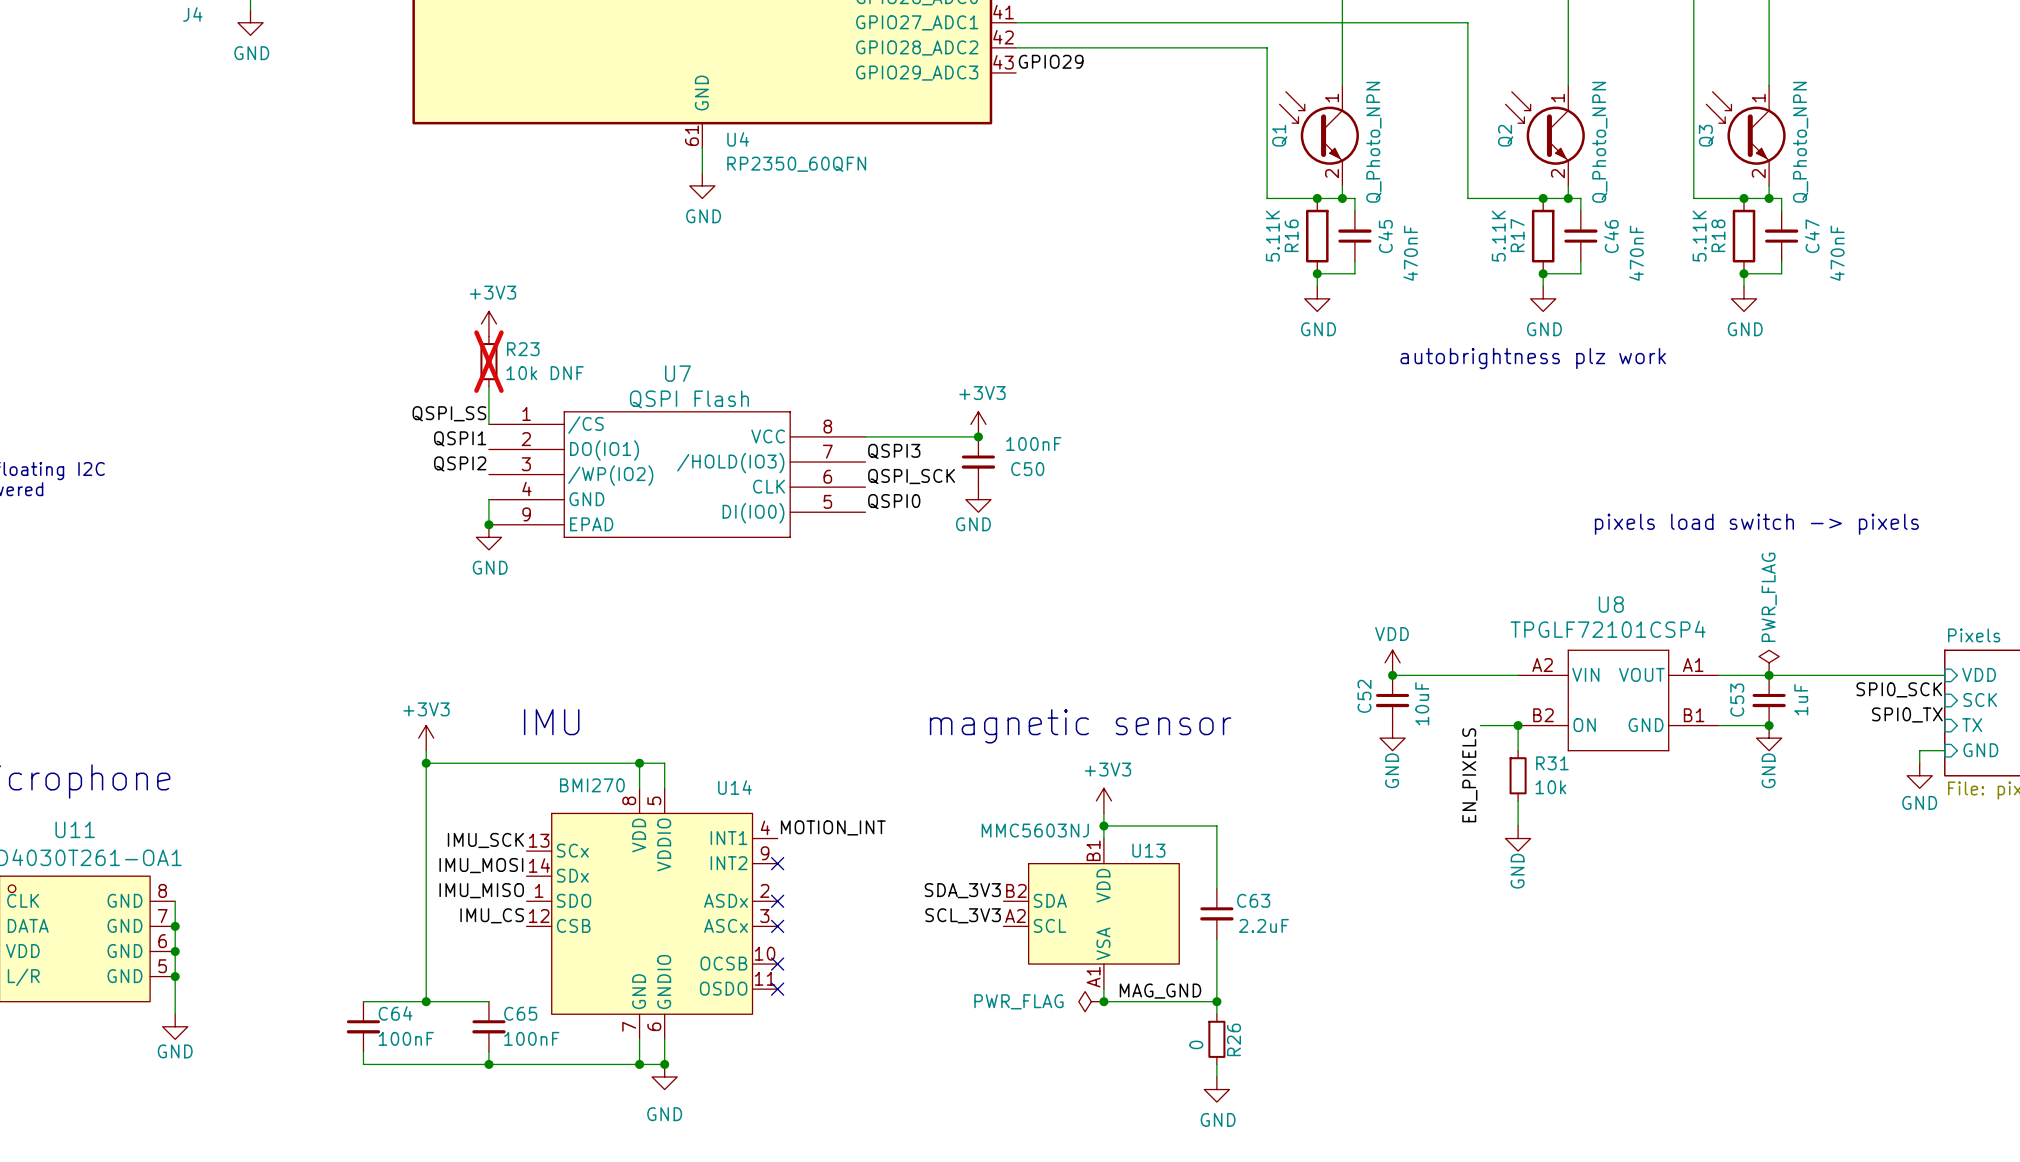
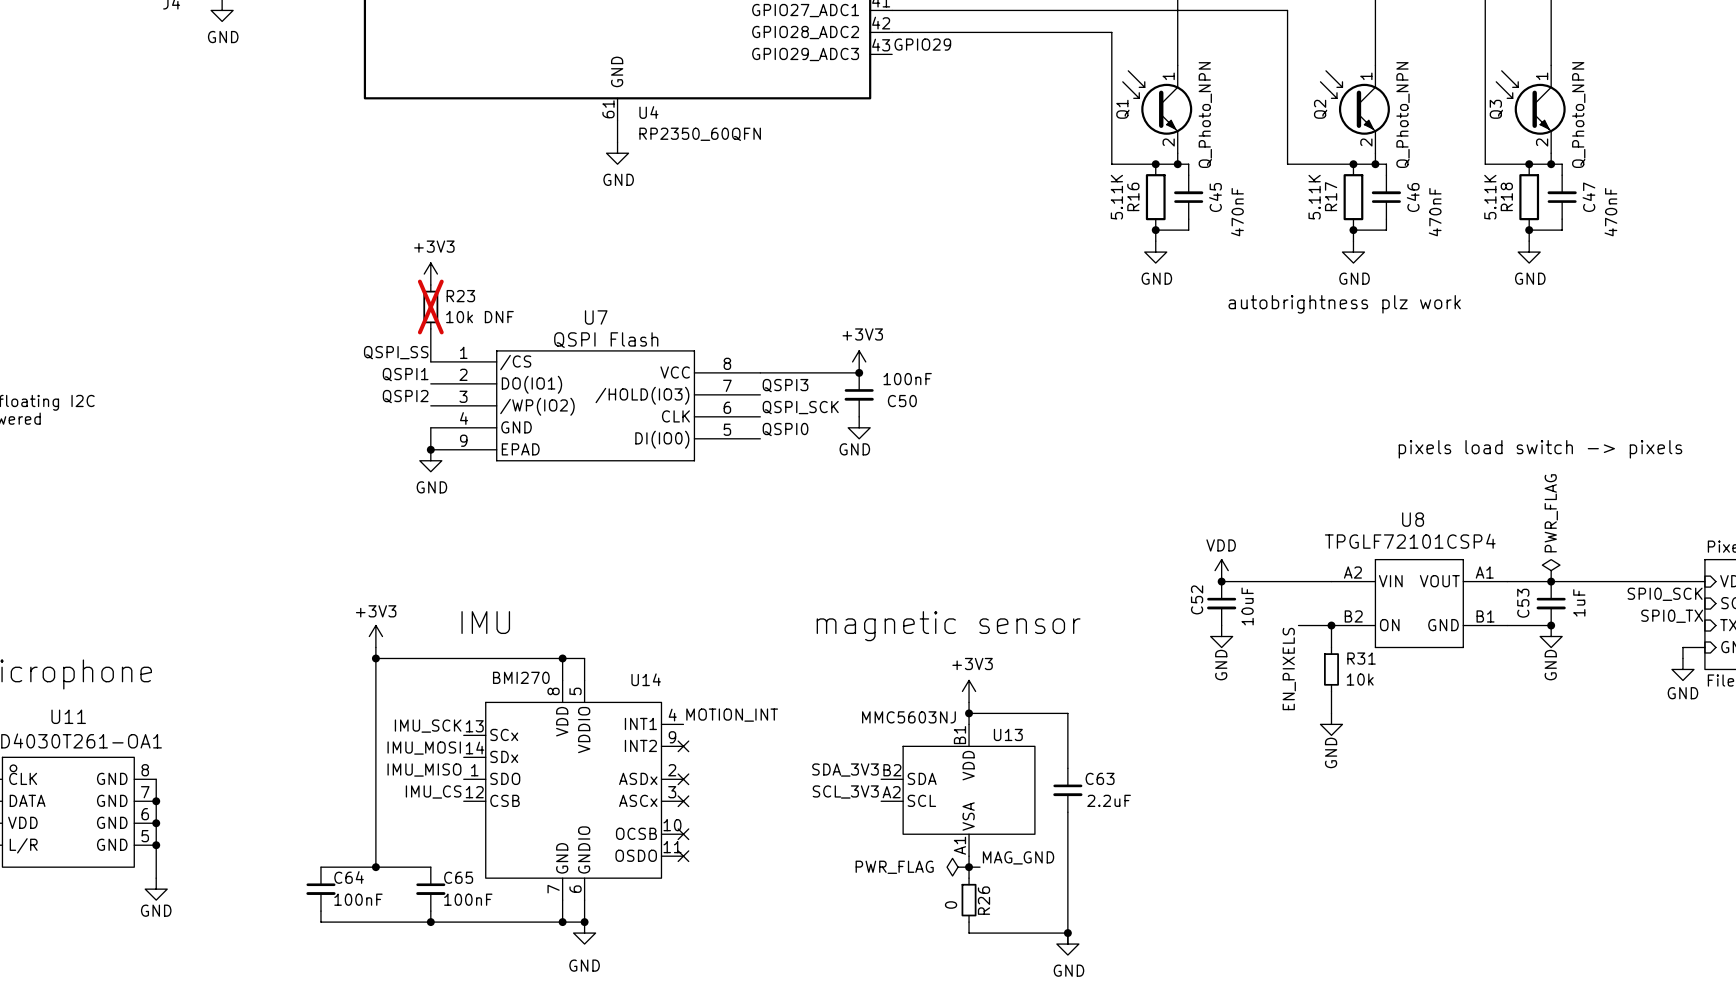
wire: none -> (969, 867) (969, 878)
wire: (1116, 1001) (1216, 1001) -> none
junction: (1216, 1001) -> none
wire: none -> (1067, 878) (1067, 922)
R26 position: (1216, 1039) -> (969, 900)
wire: none -> (969, 922) (969, 933) (1067, 933) (1067, 944)
junction: none -> (1067, 933)

